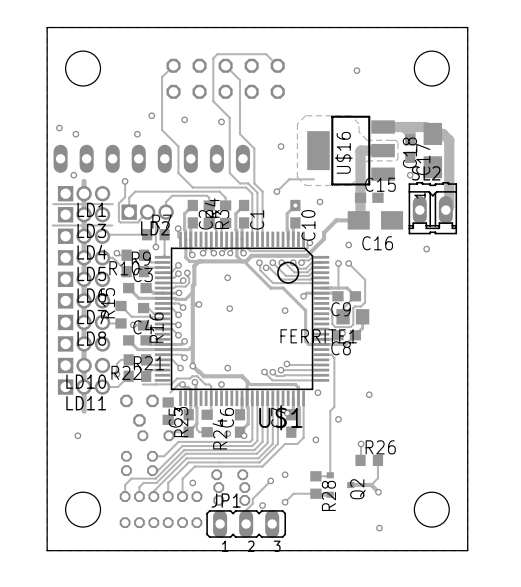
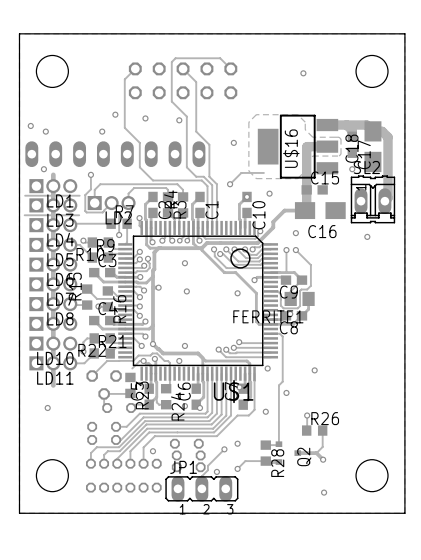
track: none -> (107, 361) (92, 376)
track: none -> (129, 393) (104, 393) (104, 404)

